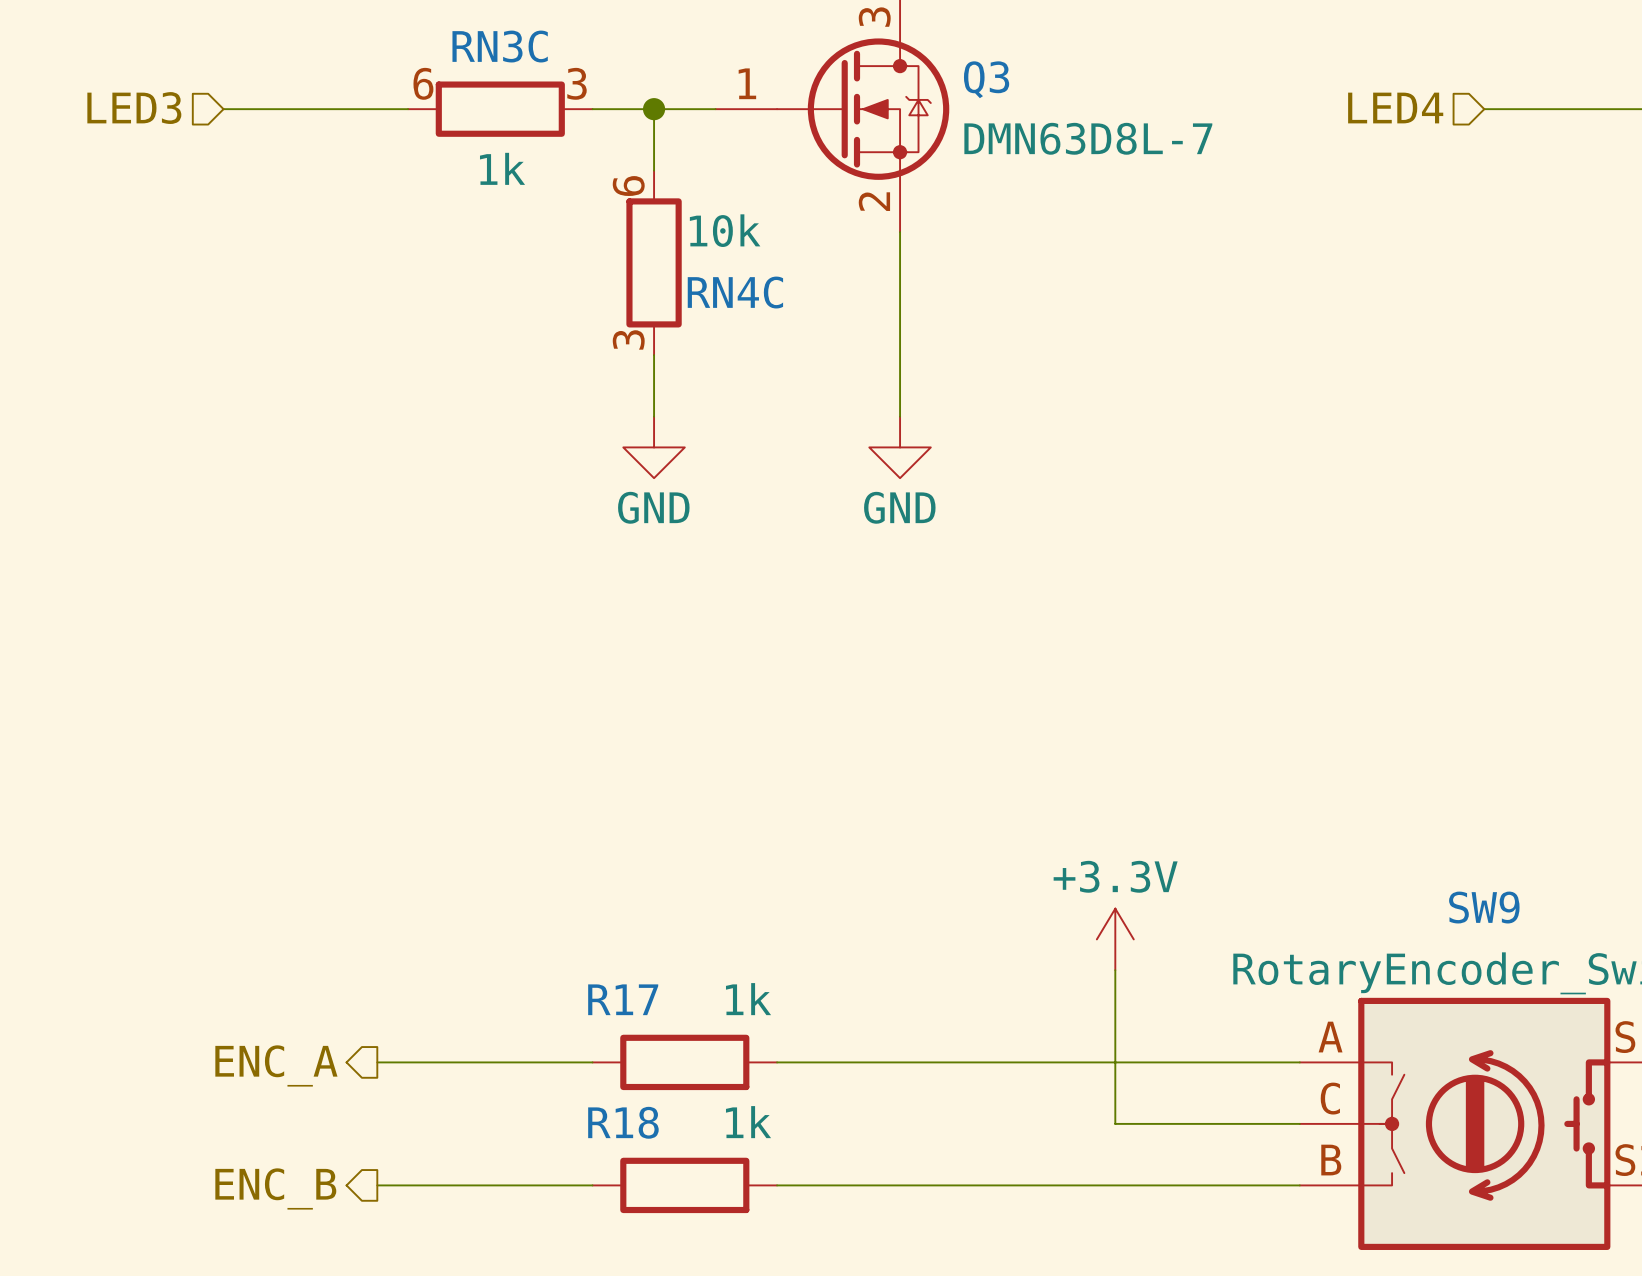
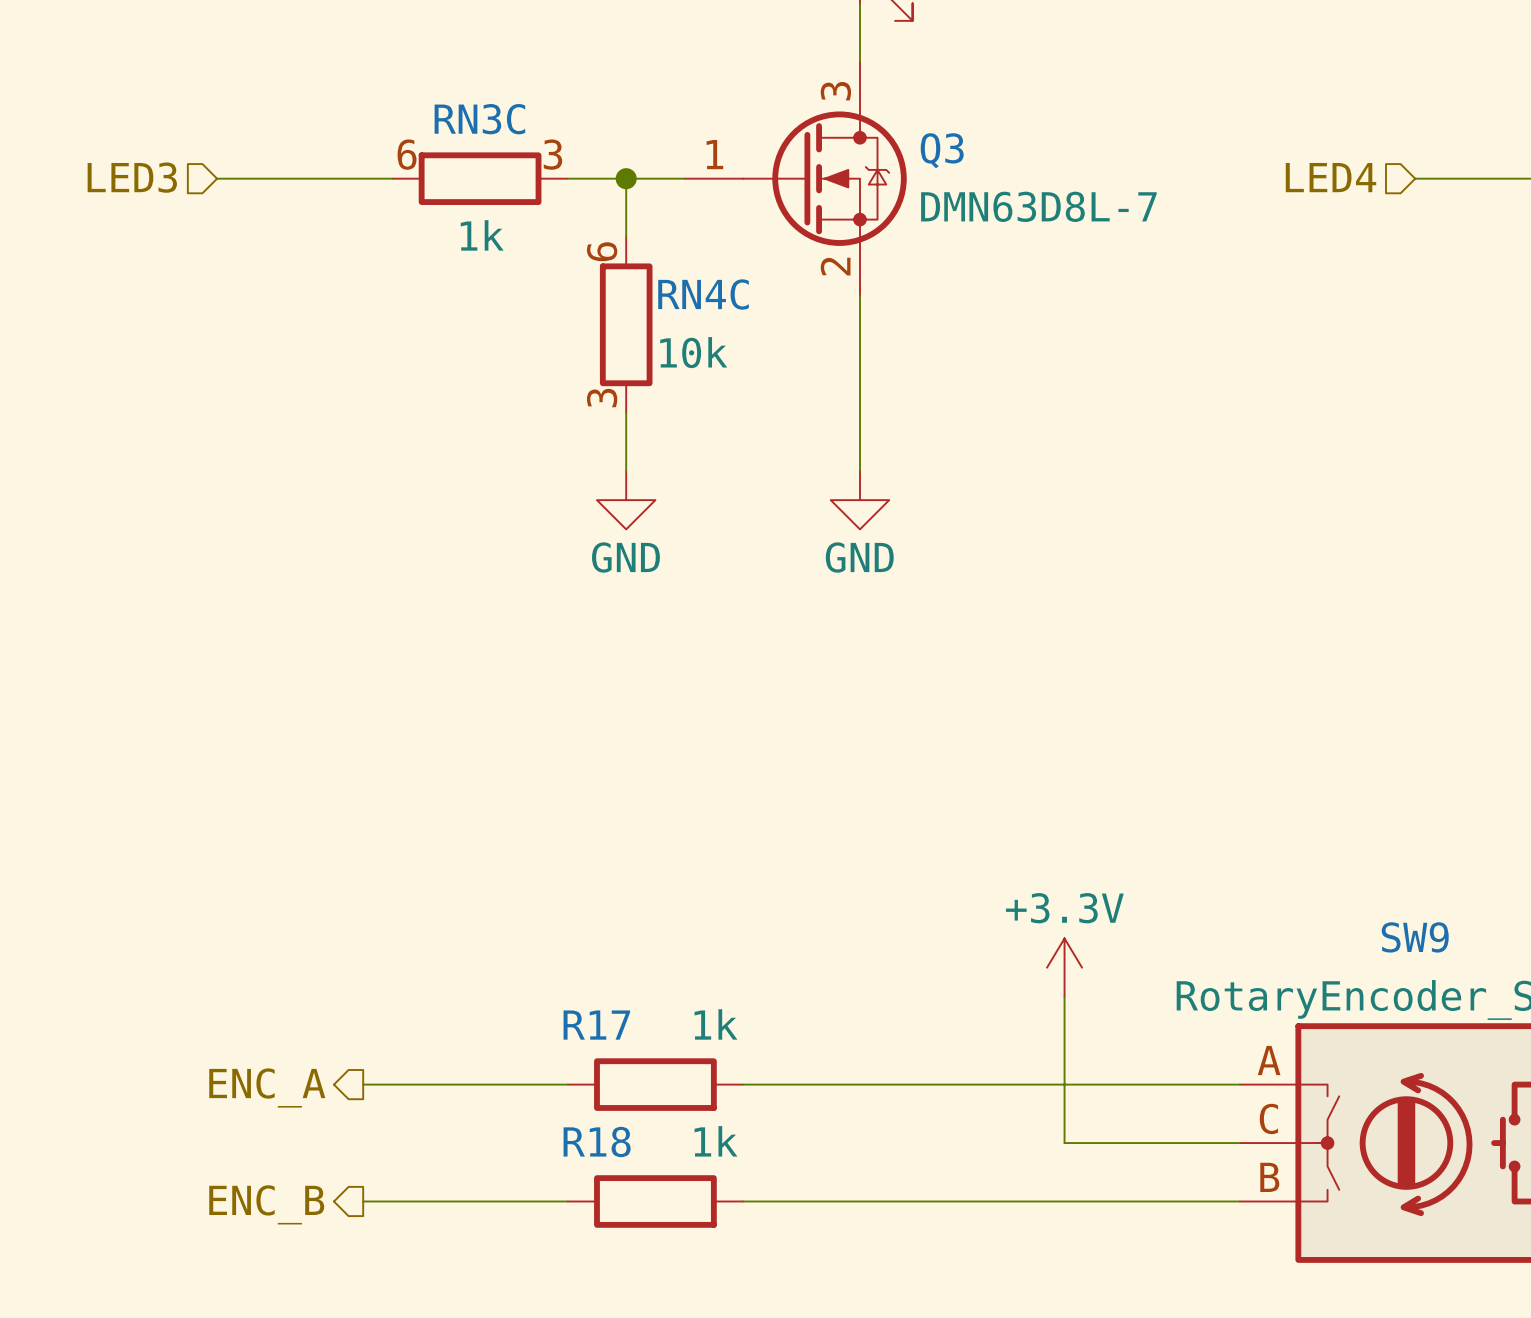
RN4C value position: 10k (725, 230) -> 10k (693, 352)
RN4C name position: RN4C (735, 292) -> RN4C (703, 294)

